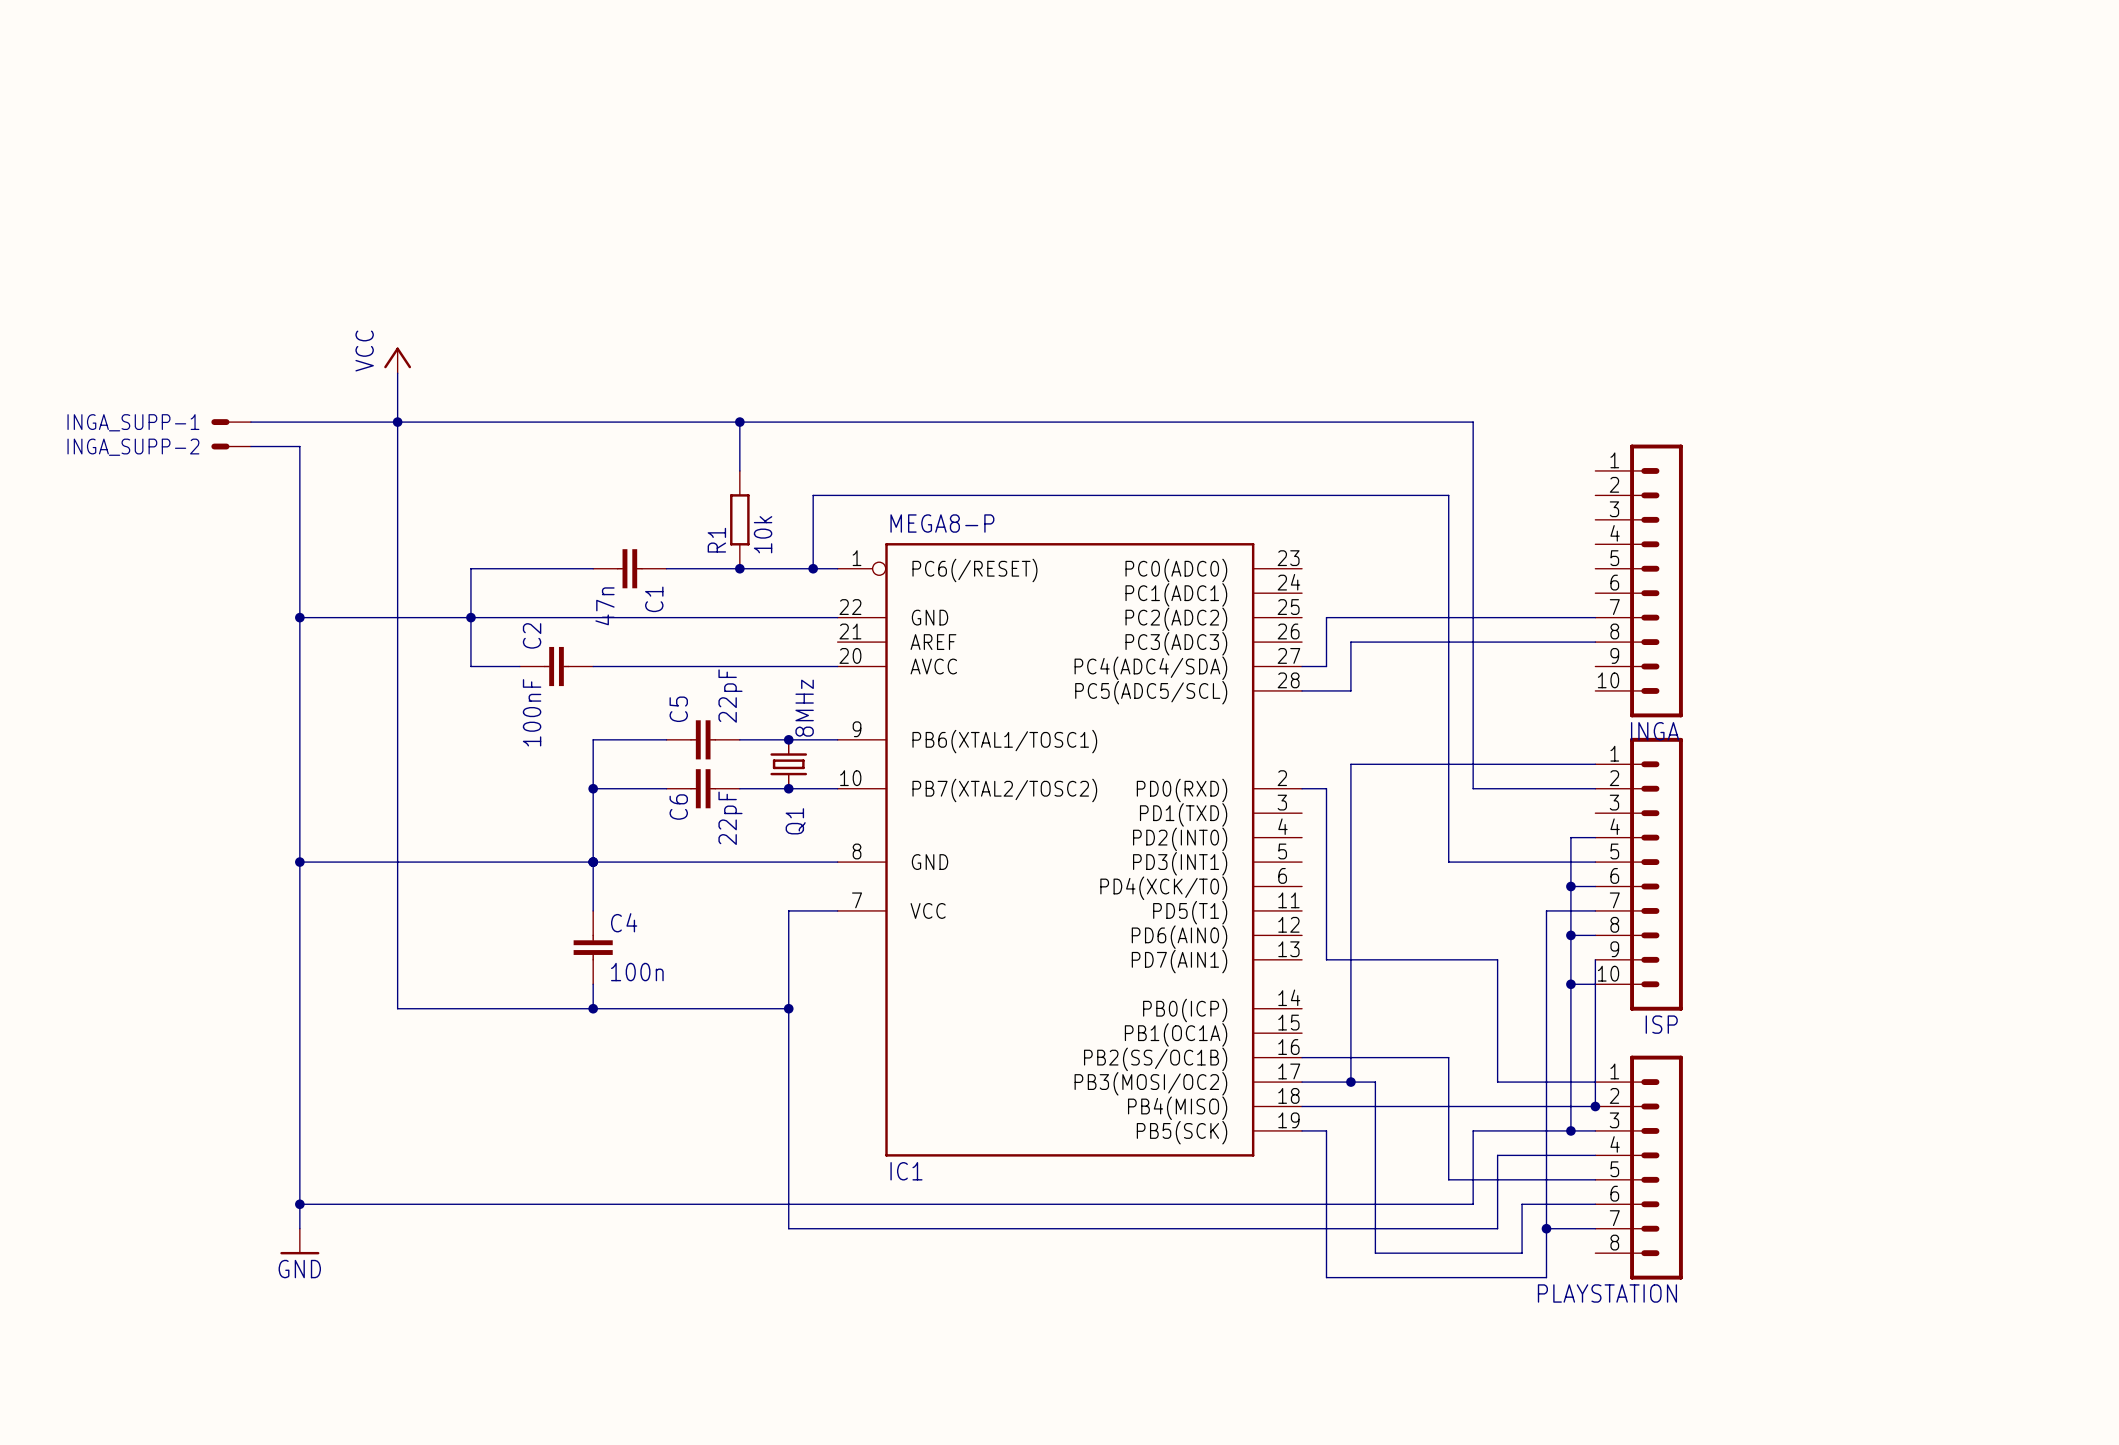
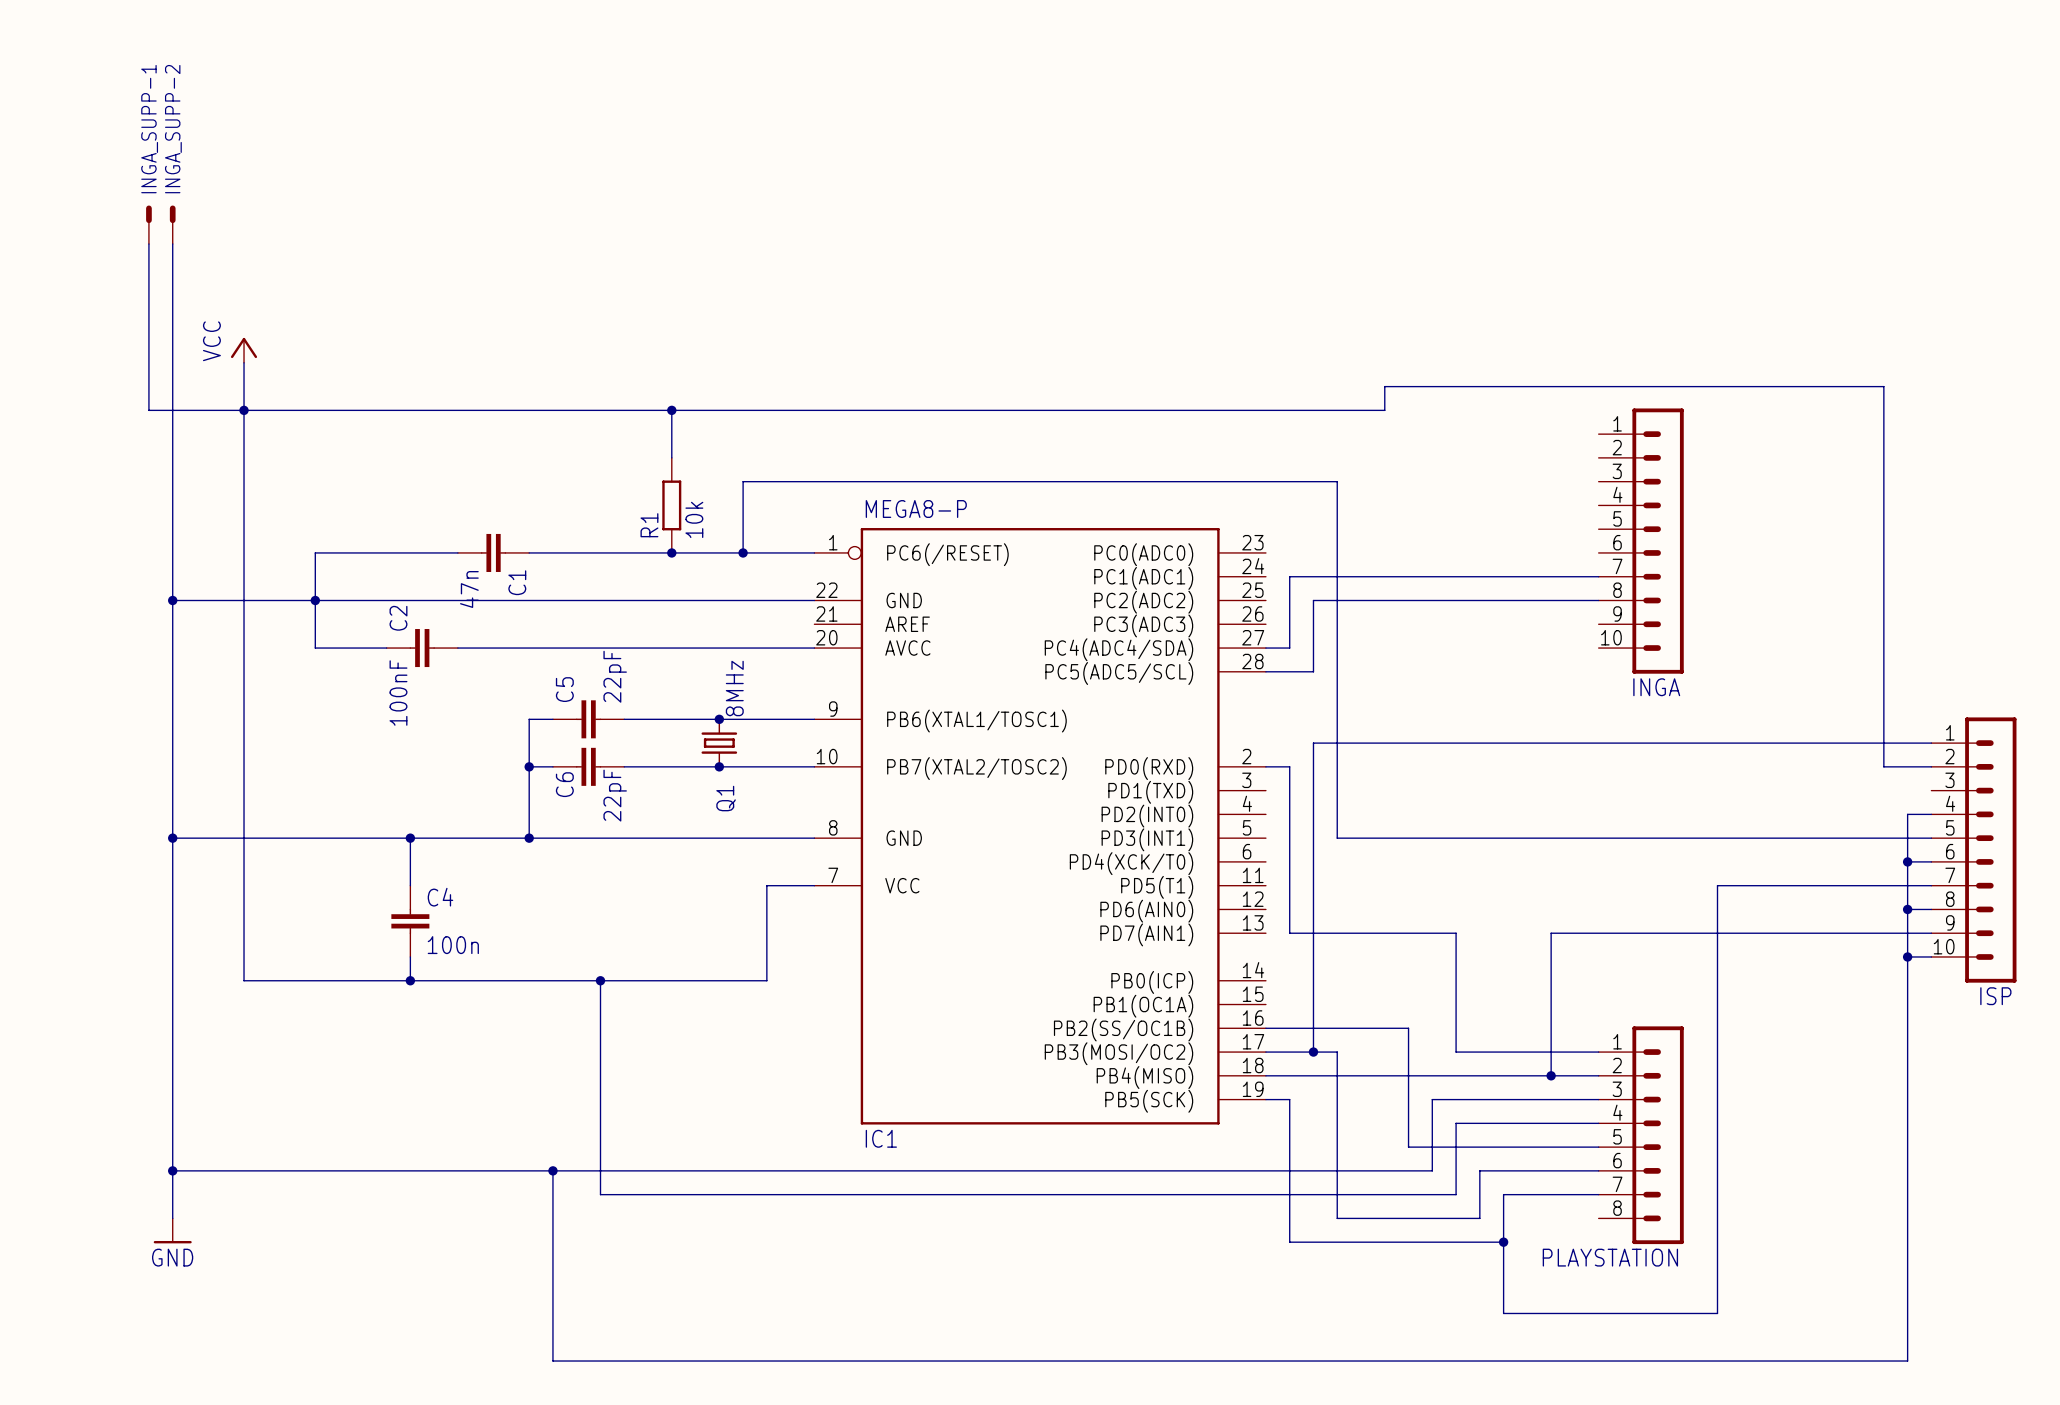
wire: none -> (148, 244) (148, 410) (244, 410)
wire: none -> (172, 244) (172, 1218)
power symbol position: VCC (397, 360) -> VCC (244, 350)
wire: (397, 373) (397, 1008) -> (244, 362) (244, 980) (386, 980)
INGA_SUPP-1 rotation: 0° (220, 422) -> 90° clockwise (148, 214)
INGA_SUPP-1 position: (231, 422) -> (148, 224)
junction: none -> (244, 410)
junction: (397, 422) -> none
wire: (739, 422) (739, 470) -> (671, 410) (671, 457)
junction position: (739, 422) -> (671, 410)
wire: (1424, 422) (1473, 422) (1473, 788) (1595, 788) -> (1384, 410) (1384, 386) (1883, 386) (1883, 766) (1931, 766)
INGA_SUPP-2 rotation: 0° (220, 446) -> 90° clockwise (172, 214)
INGA_SUPP-2 position: (231, 446) -> (172, 224)
wire: (250, 446) (299, 446) (299, 1228) -> none
wire: (813, 495) (813, 568) -> (790, 481) (743, 481) (743, 552)
wire: (1375, 495) (1448, 495) (1448, 862) -> (1337, 481) (1337, 838) (1408, 838)
R1 position: (739, 519) -> (671, 505)
wire: none -> (457, 552) (315, 552) (315, 648) (386, 648)
wire: (544, 568) (470, 568) (470, 666) -> none
C1 position: (629, 568) -> (493, 552)
junction: none -> (671, 552)
junction: (739, 568) -> none
junction: none -> (743, 552)
junction: (813, 568) -> none
INGA position: (1639, 580) -> (1641, 541)
wire: none -> (1598, 576) (1289, 576) (1289, 600)
wire: none -> (172, 600) (291, 600)
junction: none -> (172, 600)
junction position: (299, 617) -> (315, 600)
junction: (470, 617) -> none
wire: (1326, 617) (1350, 617) -> (1313, 624) (1313, 600)
wire: (1350, 642) (1595, 642) -> none
C2 position: (556, 666) -> (422, 648)
wire: none -> (552, 719) (529, 719) (529, 838)
wire: (642, 739) (593, 739) (593, 910) -> none
C5 position: (703, 739) -> (588, 719)
junction: none -> (719, 719)
junction: (788, 739) -> none
Q1 position: (788, 764) -> (719, 743)
wire: none -> (1551, 743) (1931, 743)
wire: none -> (529, 766) (552, 766)
junction: none -> (529, 766)
junction: (593, 788) -> none
C6 position: (703, 788) -> (588, 766)
junction: none -> (719, 766)
junction: (788, 788) -> none
wire: (1595, 837) (1570, 837) (1570, 1130) -> none
wire: none -> (1931, 814) (1907, 814) (1907, 1361) (552, 1361) (552, 1170)
wire: none -> (172, 838) (291, 838)
junction: none -> (172, 838)
junction: (299, 862) -> none
wire: none -> (410, 838) (410, 885)
junction: none -> (410, 838)
junction: none -> (529, 838)
junction: (593, 862) -> none
wire: none -> (1551, 838) (1931, 838)
ISP: (1639, 874) -> none
ISP: none -> (1973, 850)
wire: (1570, 886) (1595, 886) -> none
junction: (1570, 886) -> none
wire: none -> (1907, 861) (1931, 861)
junction: none -> (1907, 861)
wire: (1595, 910) (1546, 910) (1546, 1228) -> none
wire: none -> (1931, 885) (1717, 885) (1717, 1313) (1503, 1313) (1503, 1242)
wire: (1570, 935) (1595, 935) -> none
junction: (1570, 935) -> none
wire: none -> (1907, 909) (1931, 909)
junction: none -> (1907, 909)
C4 position: (593, 947) -> (410, 921)
wire: none -> (1551, 933) (1931, 933)
wire: (593, 984) (593, 1008) -> (410, 956) (410, 980)
wire: (1570, 984) (1595, 984) -> none
junction: (1570, 984) -> none
wire: none -> (1907, 956) (1931, 956)
junction: none -> (1907, 956)
junction: none -> (410, 980)
junction position: (593, 1008) -> (600, 980)
wire: (788, 1008) (788, 1228) -> (600, 980) (600, 1194) (766, 1194)
junction: (788, 1008) -> none
junction: (1570, 1130) -> none
PLAYSTATION position: (1639, 1167) -> (1641, 1135)
wire: none -> (172, 1170) (291, 1170)
junction: none -> (172, 1170)
junction: (299, 1204) -> none
junction: none -> (552, 1170)
junction position: (1546, 1228) -> (1503, 1242)
power symbol position: GND (299, 1241) -> GND (172, 1230)

